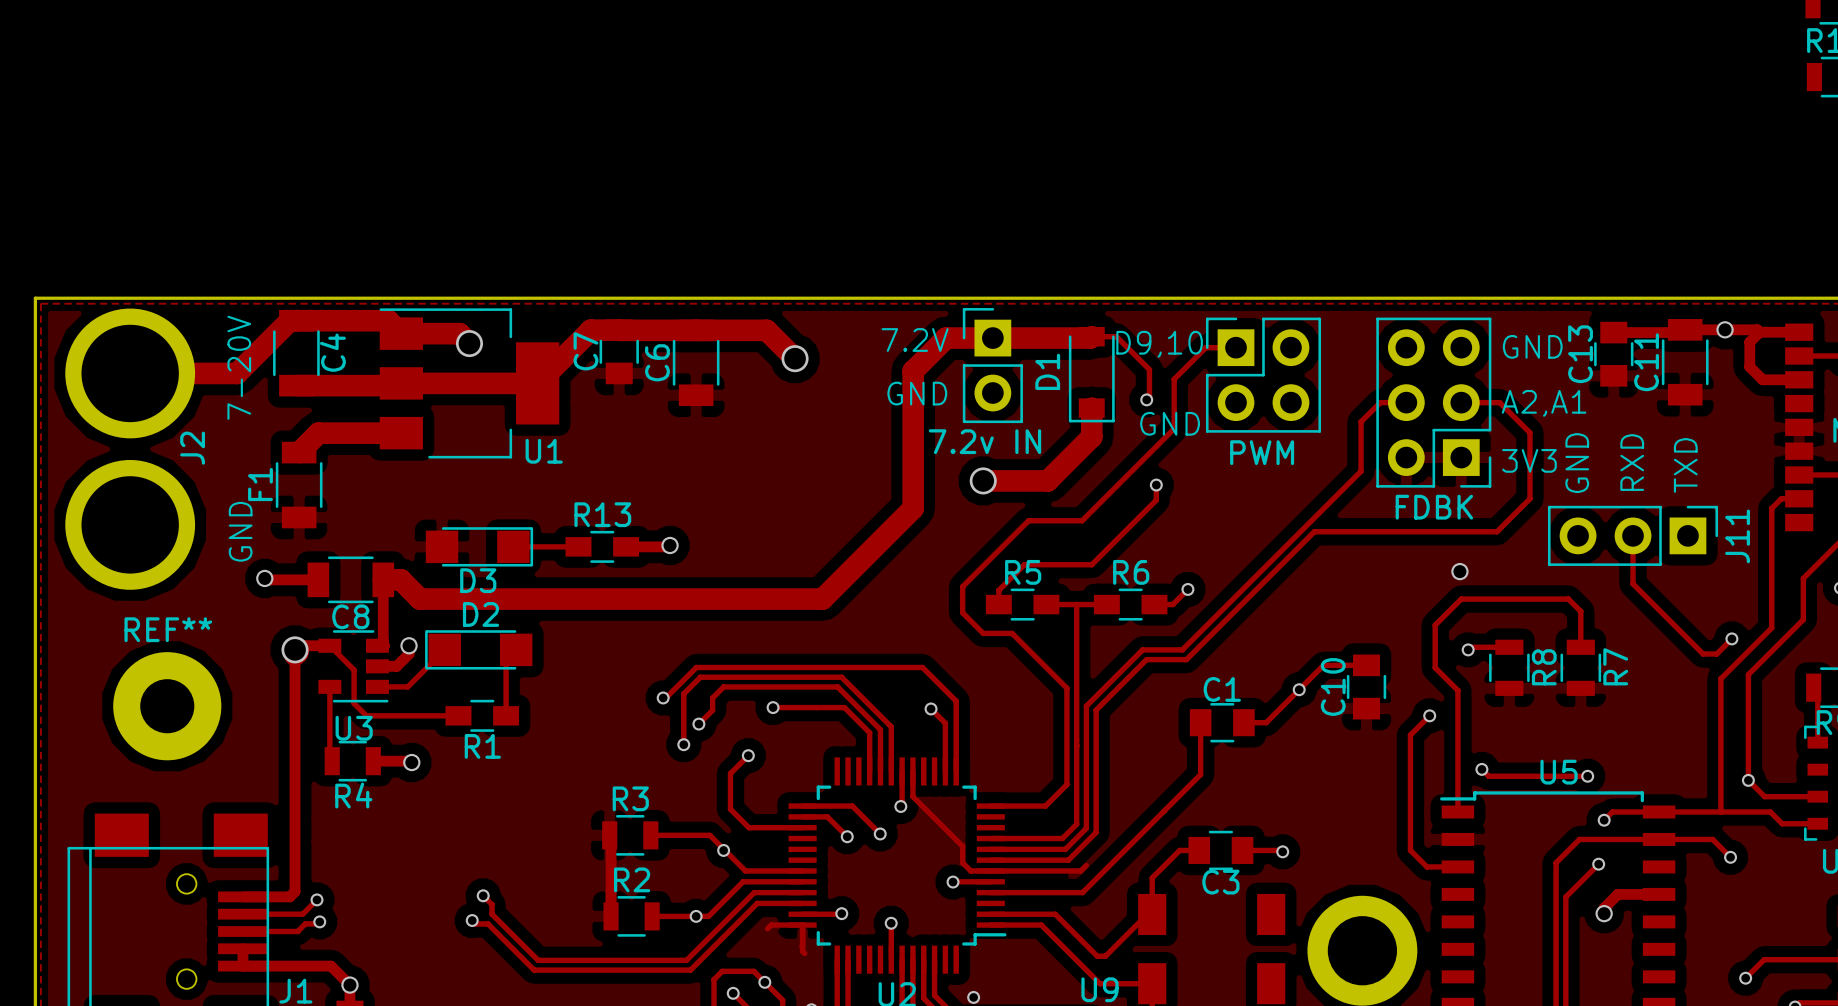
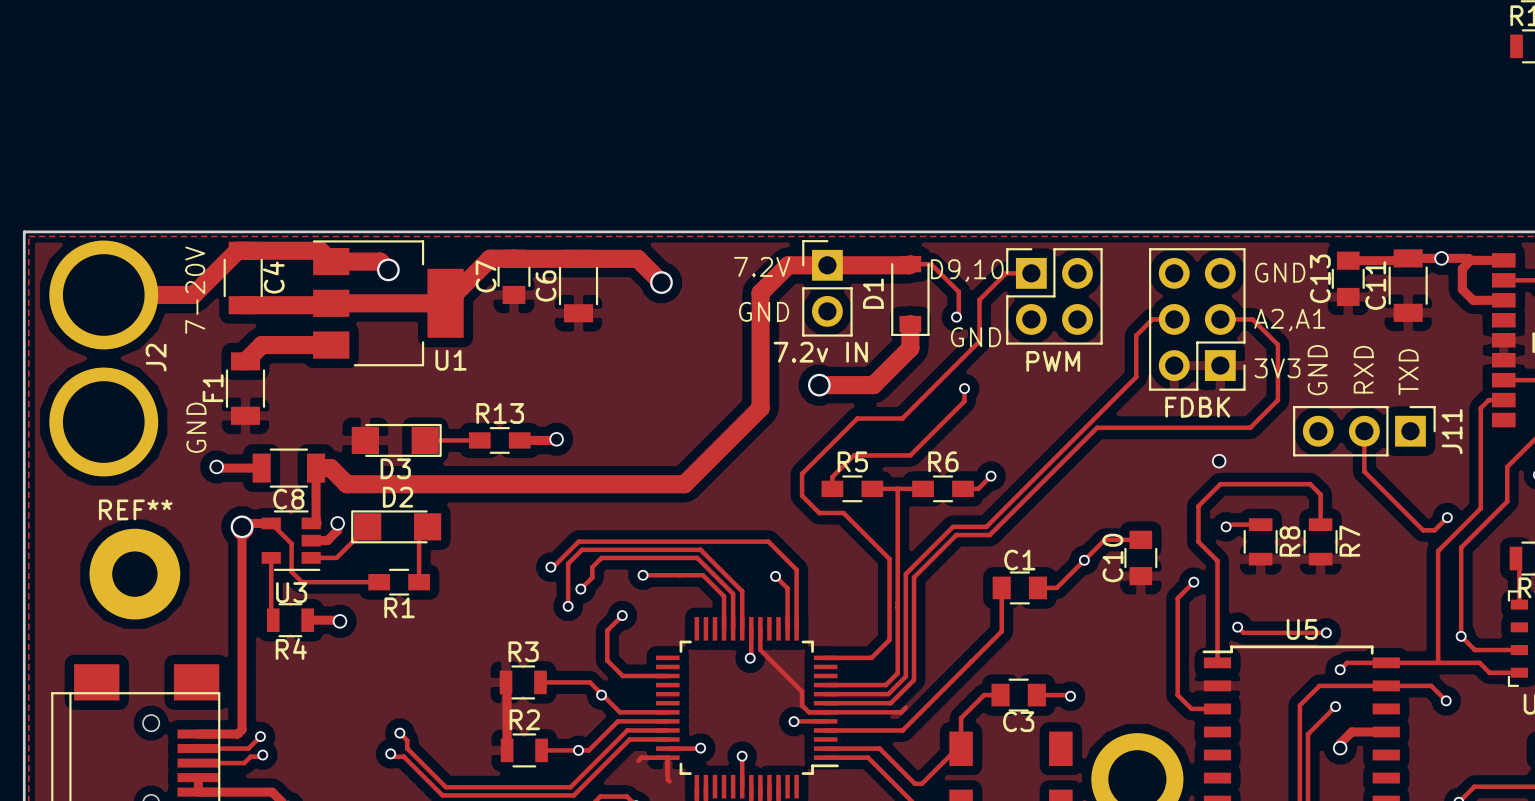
track: (802, 806) (852, 806) (880, 833) -> none
track: (802, 816) (827, 816) (847, 836) -> none
via: (880, 833) -> none
via: (847, 836) -> none

